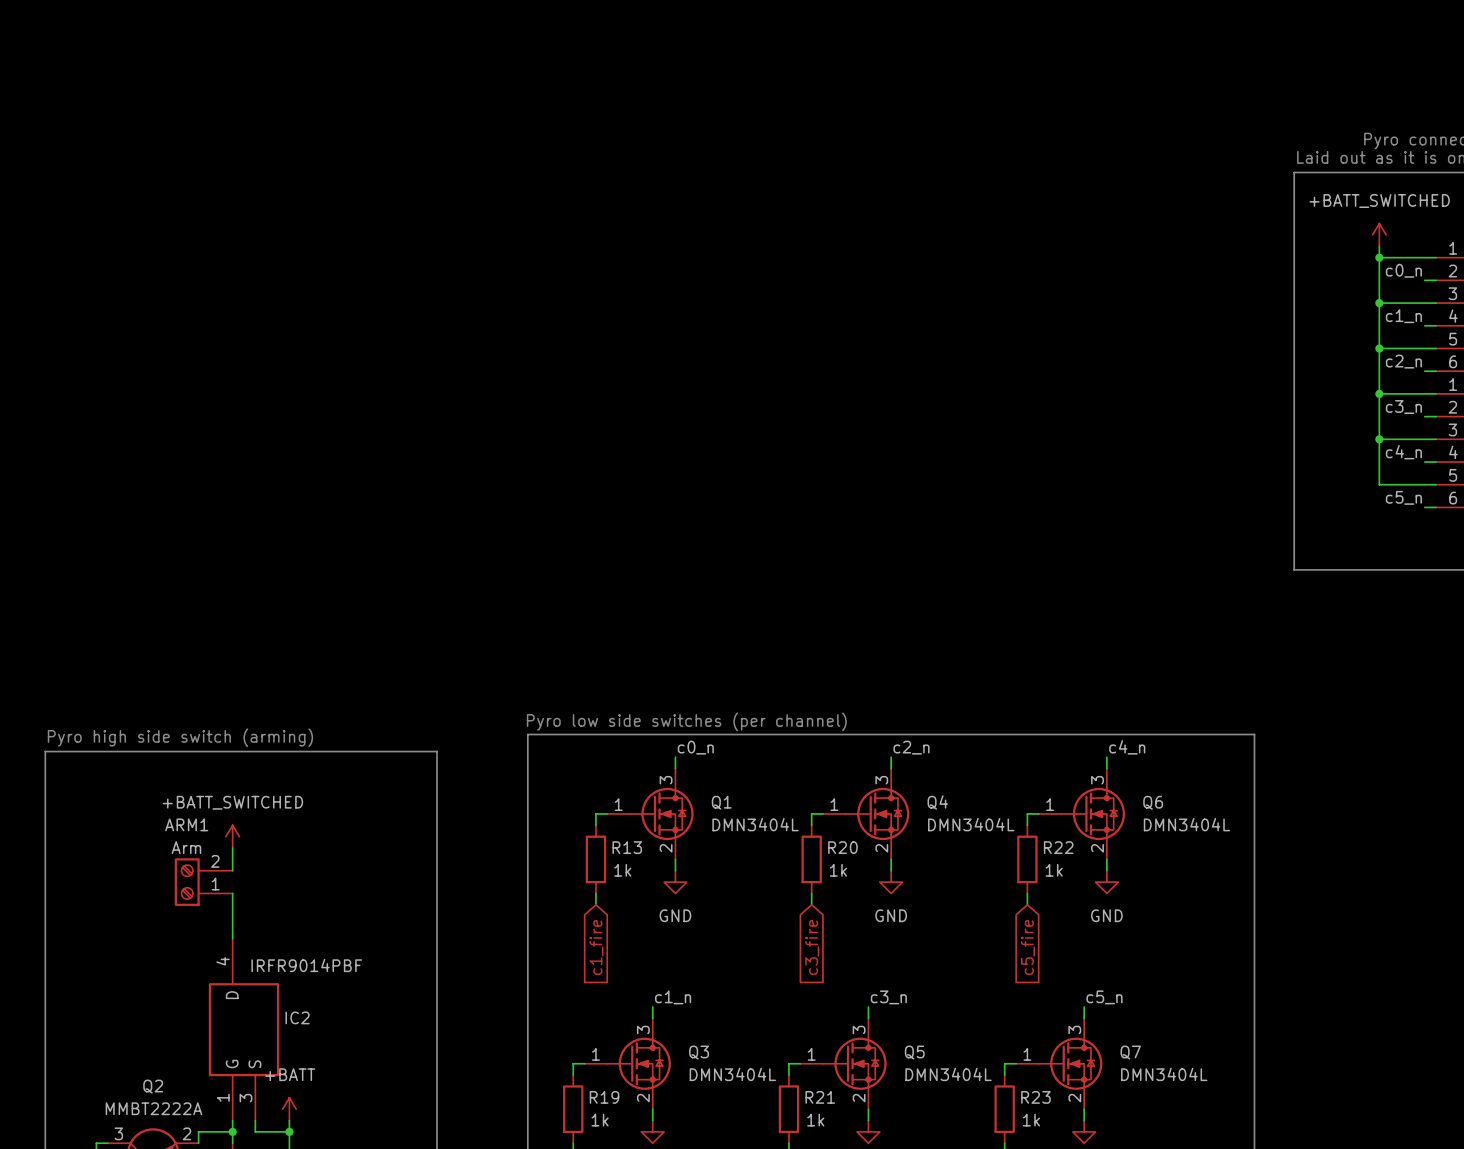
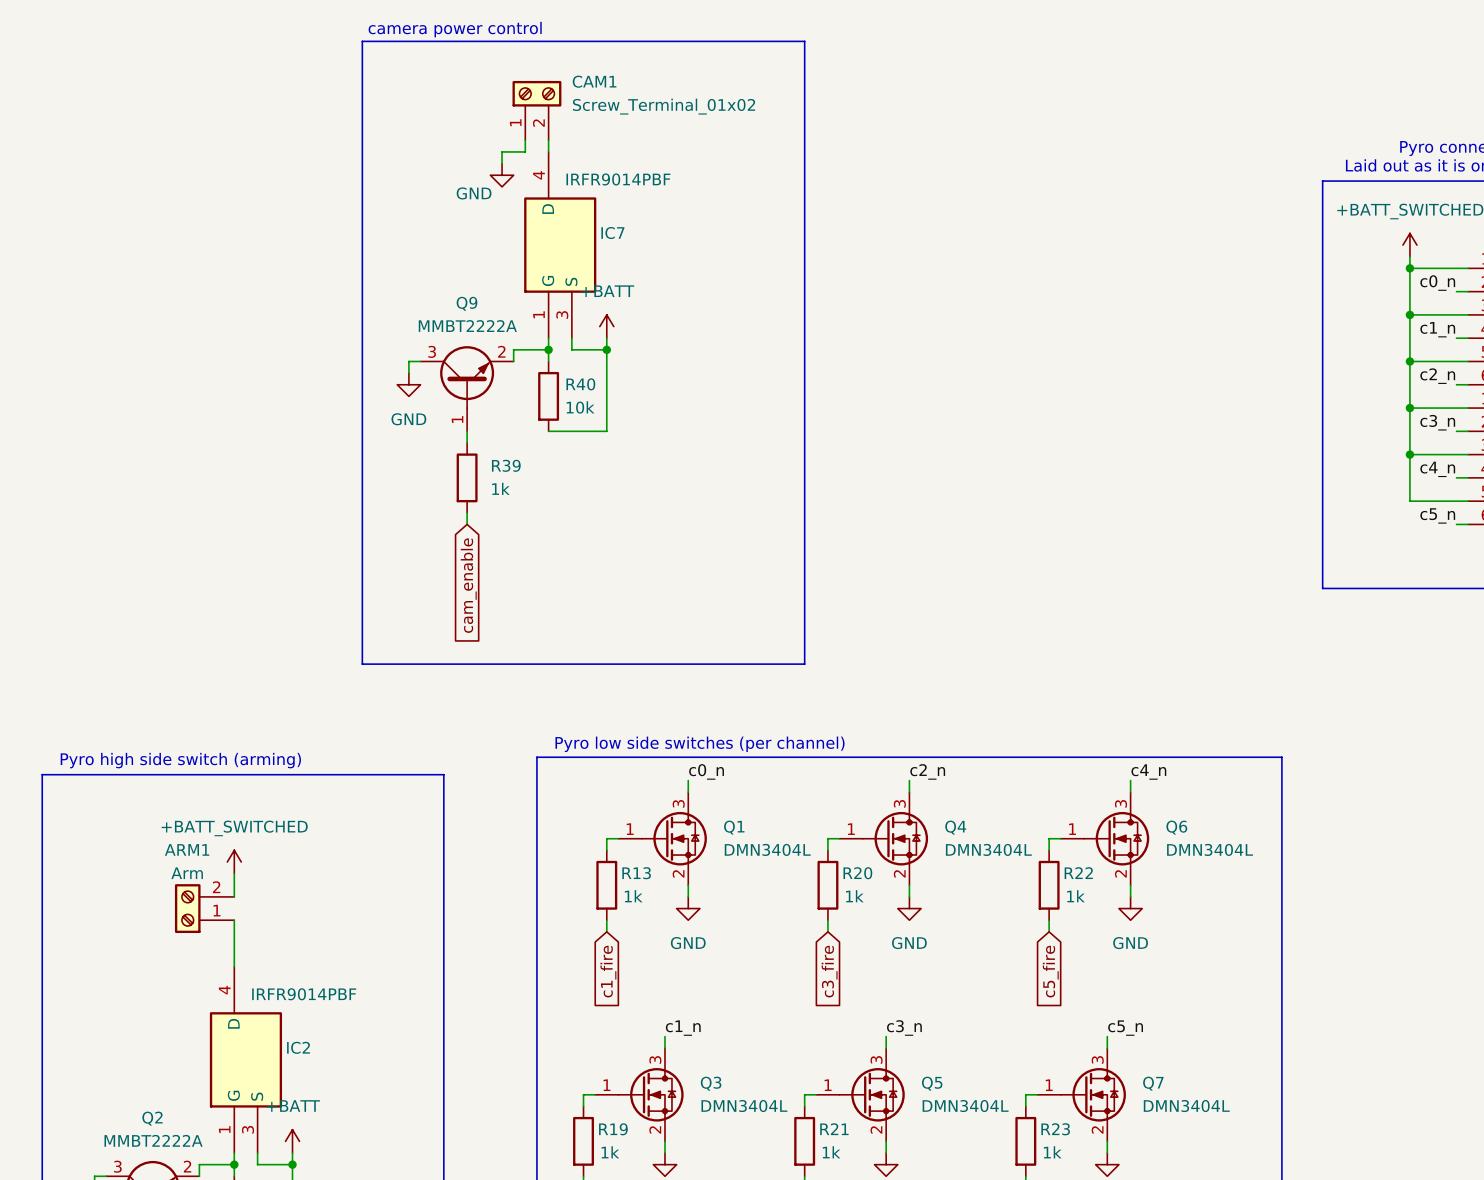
text: none -> camera power control (455, 29)
line: none -> (362, 41) (804, 41) (804, 664) (362, 664) (362, 41)
CAM1: none -> Screw_Terminal_01x02 (536, 110)
wire: none -> (525, 140) (525, 151) (502, 151) (502, 163)
wire: none -> (548, 140) (548, 151)
power symbol: none -> GND (502, 175)
IC7: none -> IRFR9014PBF (560, 245)
power symbol: none -> +BATT (606, 326)
wire: none -> (548, 338) (548, 361)
wire: none -> (571, 338) (571, 349) (606, 349)
wire: none -> (606, 338) (606, 431) (548, 431)
wire: none -> (548, 349) (513, 349) (513, 361)
junction: none -> (548, 349)
junction: none -> (606, 349)
wire: none -> (420, 361) (408, 361) (408, 373)
power symbol: none -> GND (408, 384)
Q9: none -> MMBT2222A (467, 388)
R40: none -> 10k (548, 396)
wire: none -> (467, 431) (467, 442)
R39: none -> 1k (467, 477)
wire: none -> (467, 512) (467, 524)
global label: none -> cam_enable (468, 585)

